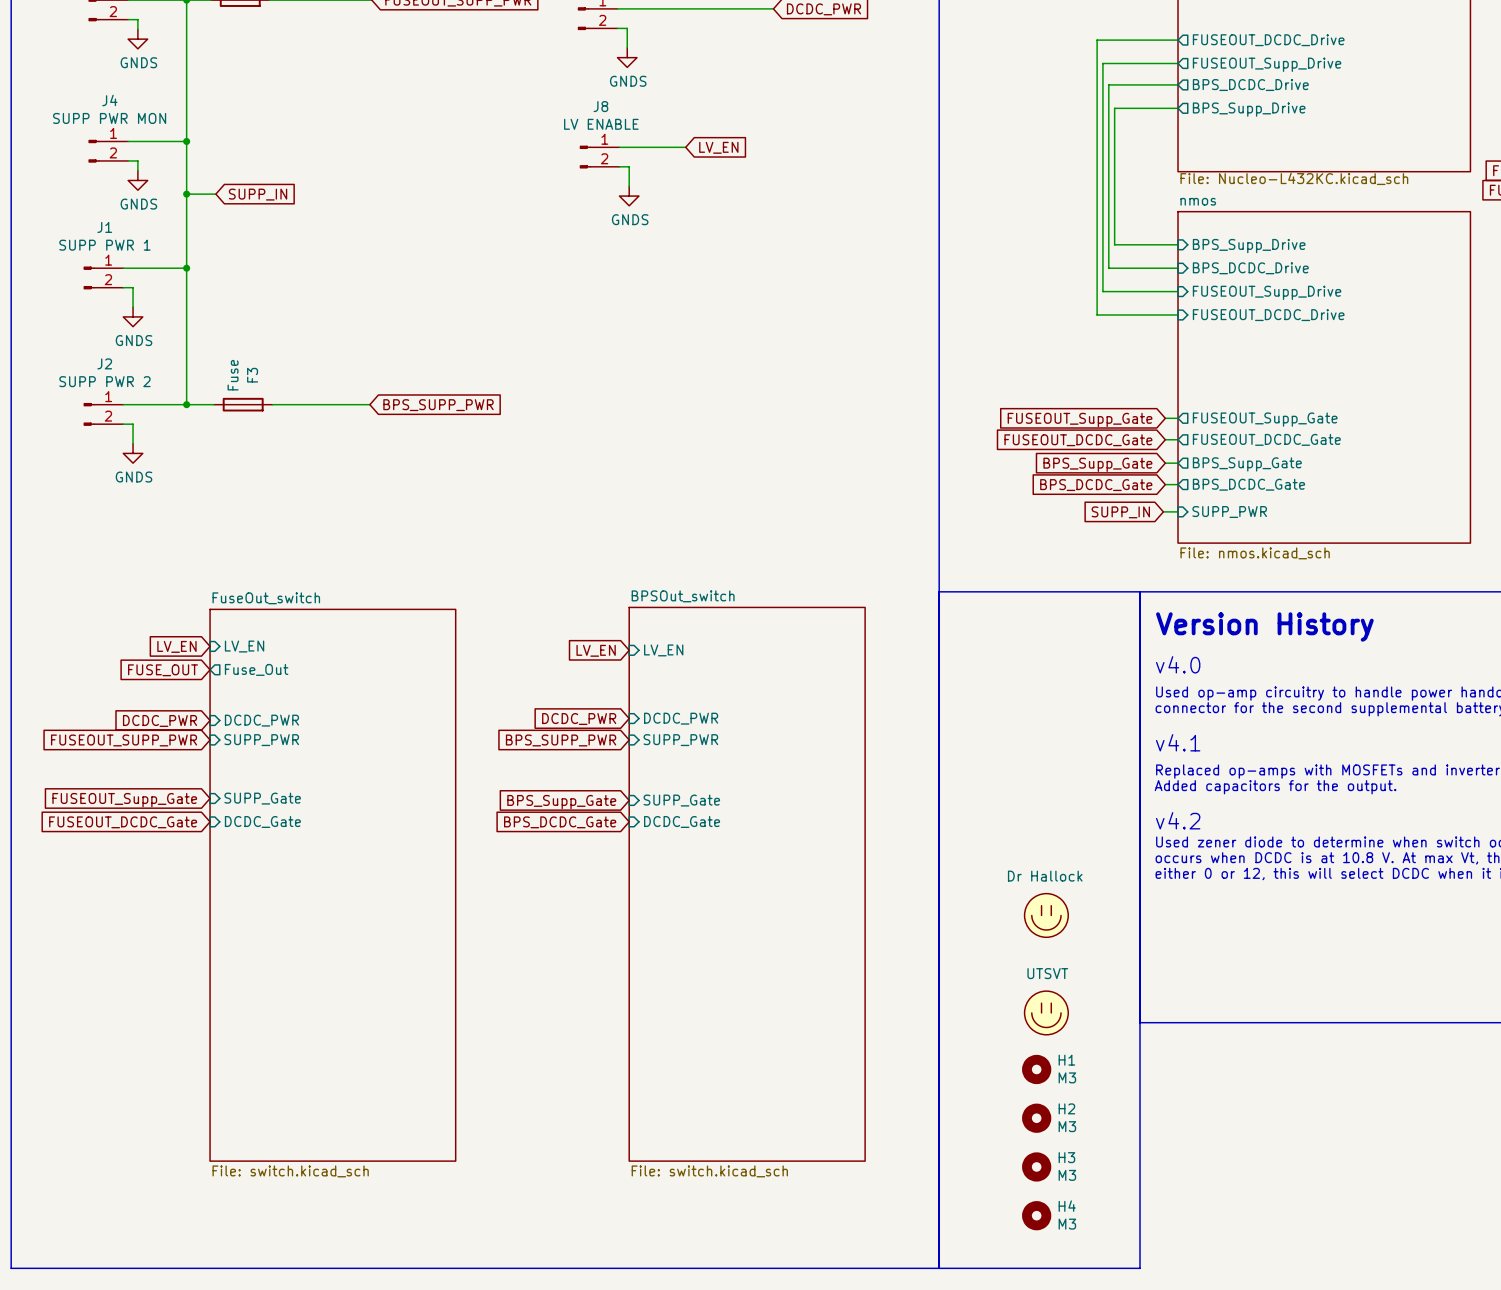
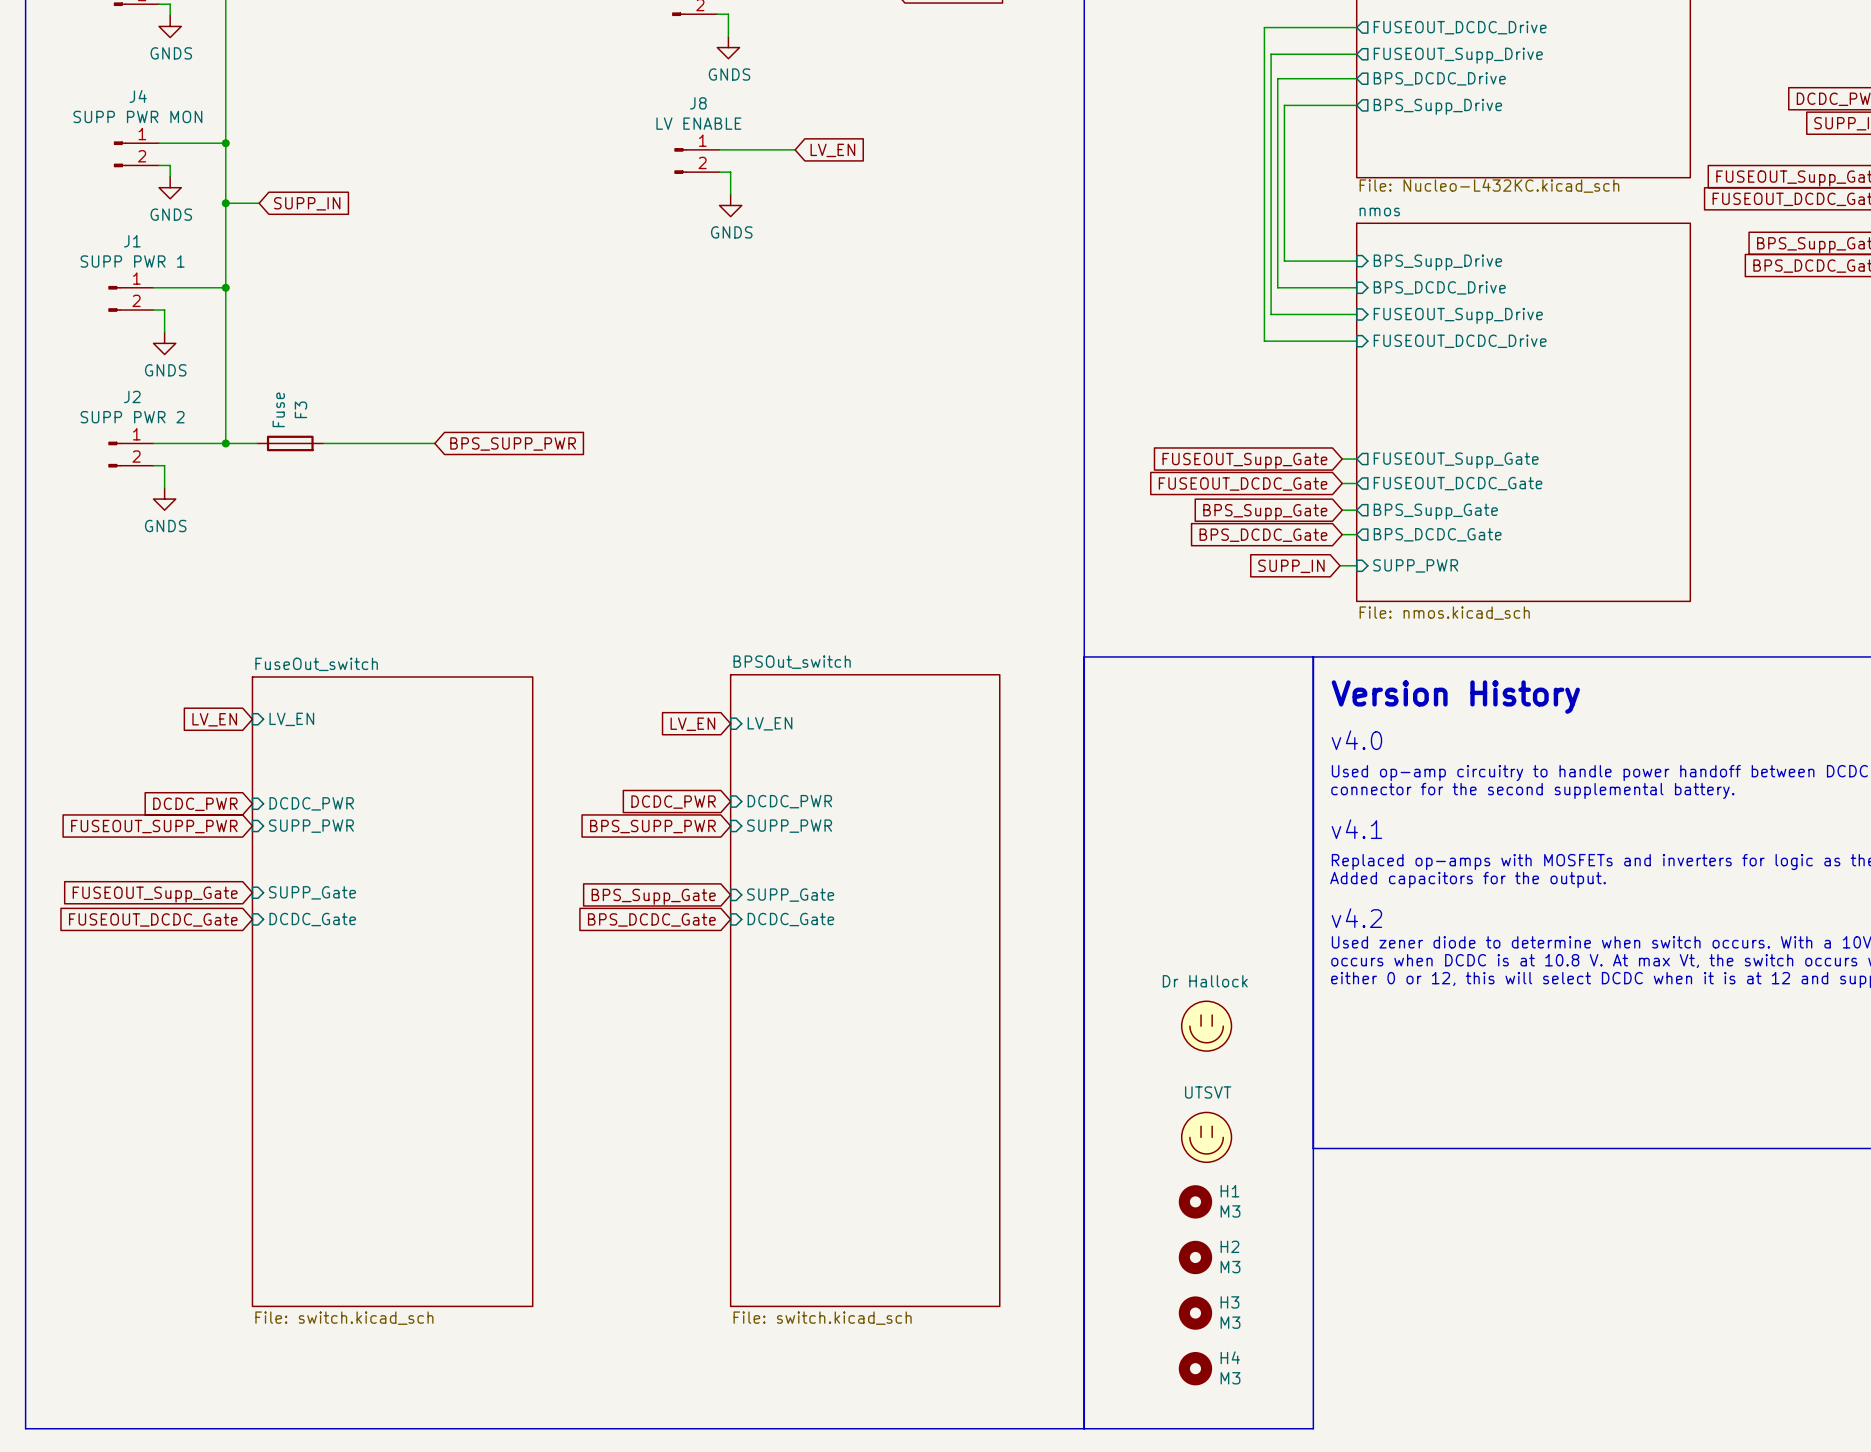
sheet pin: Fuse_Out (256, 669) -> none
global label: FUSE_OUT (163, 670) -> none

